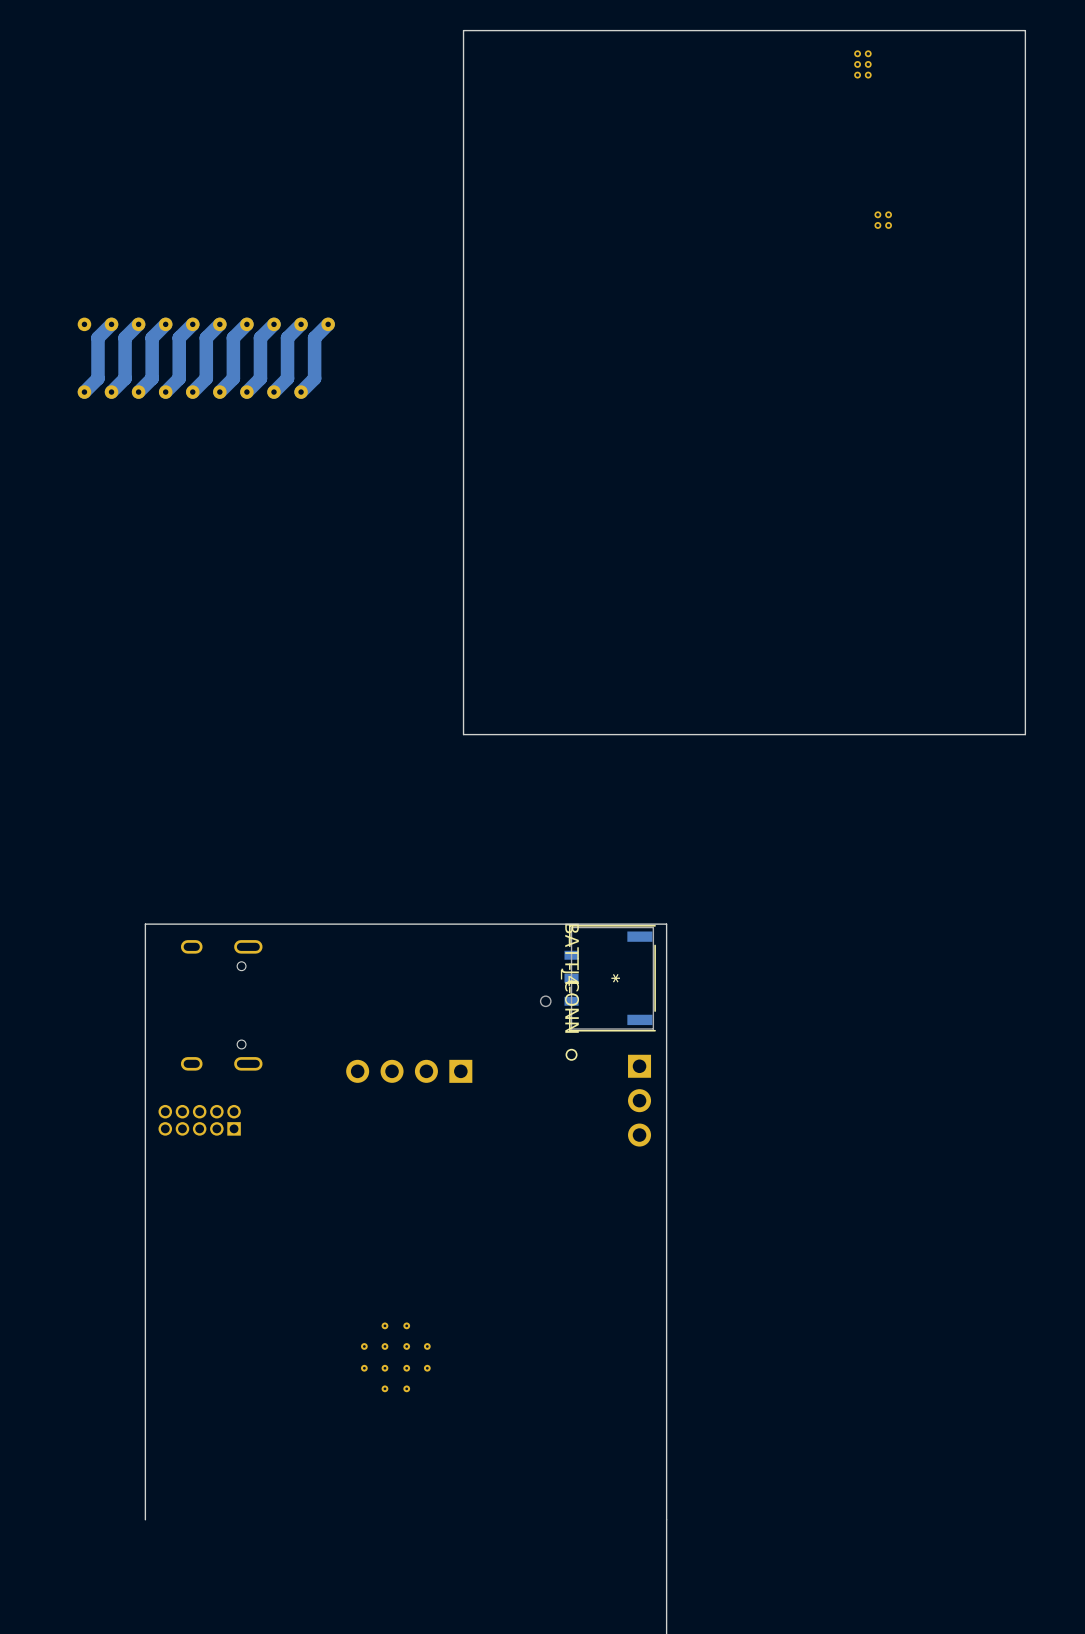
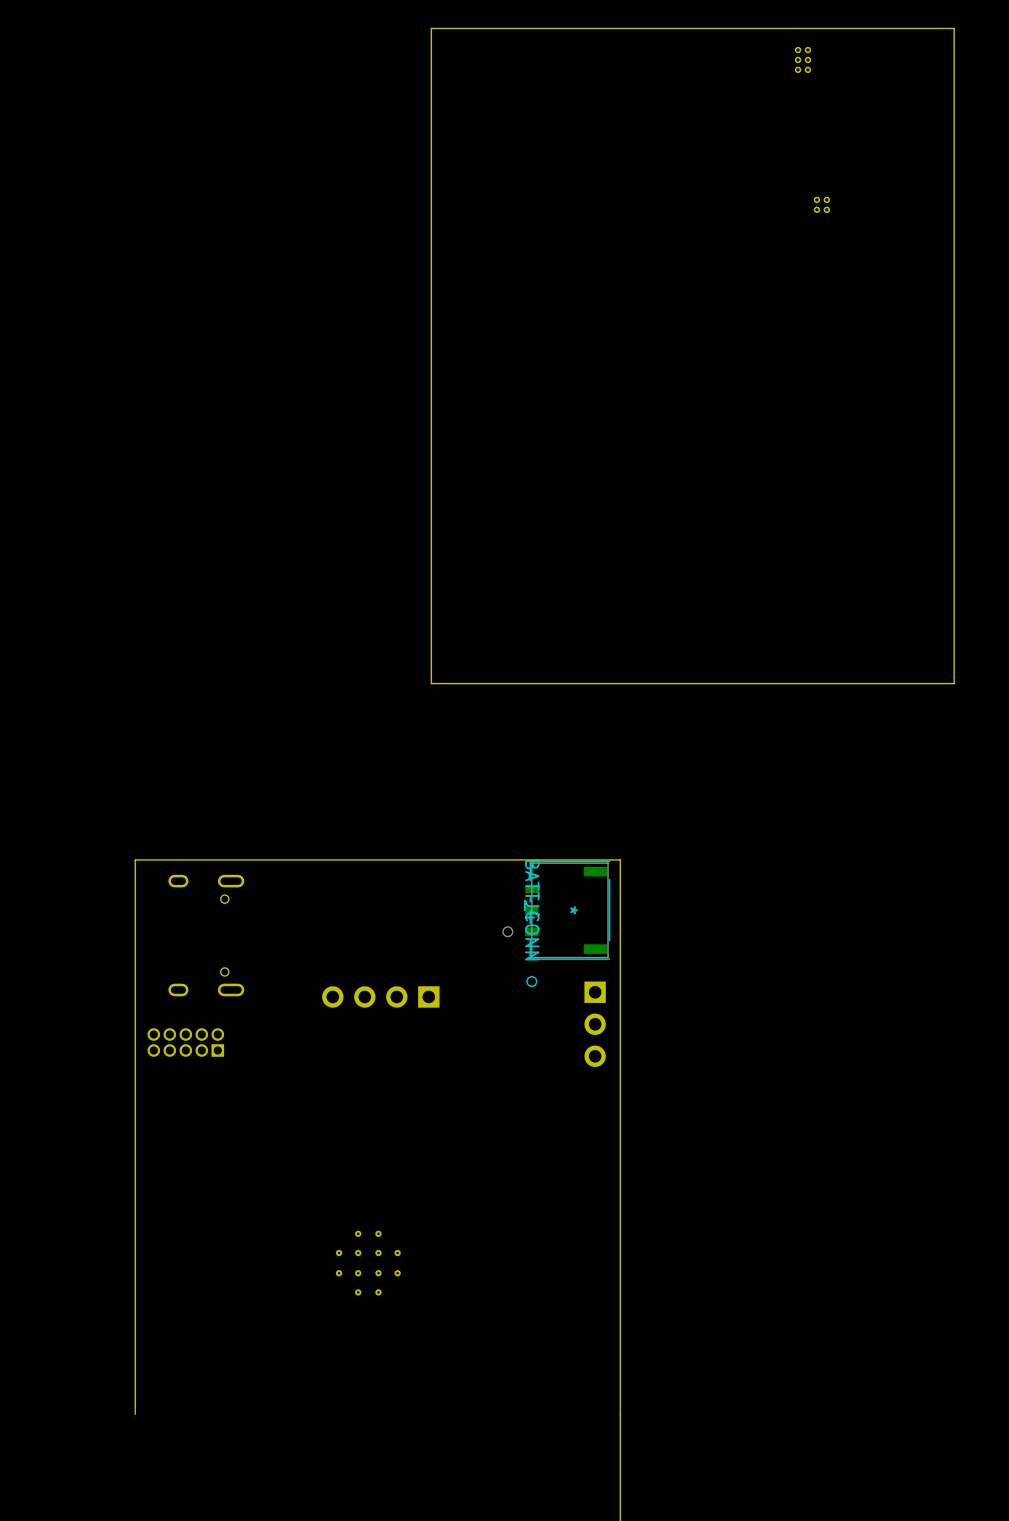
part: (206, 358) -> none

